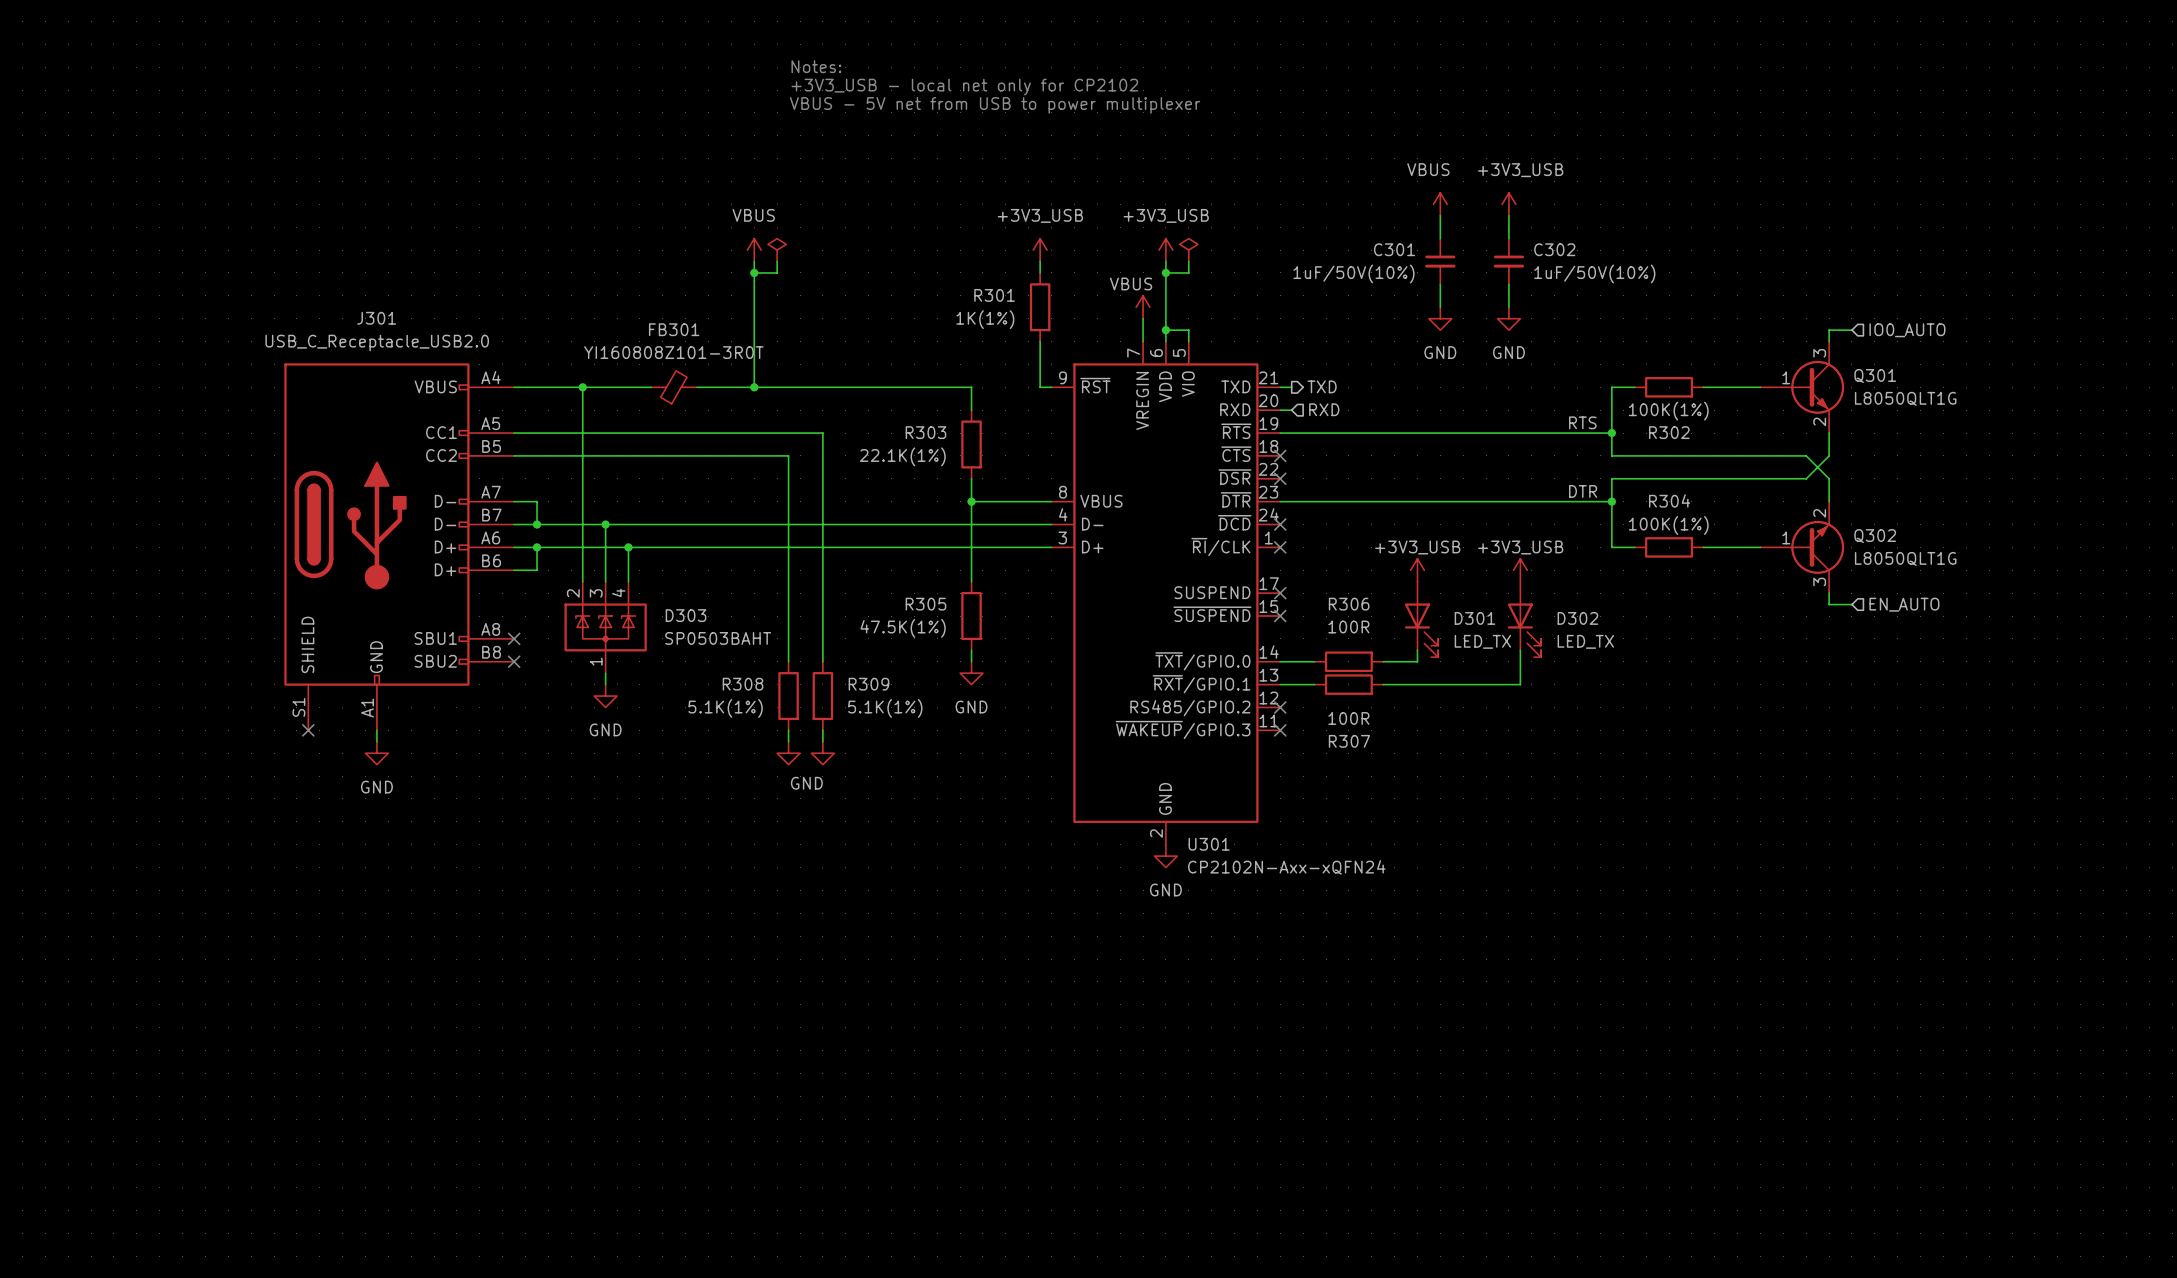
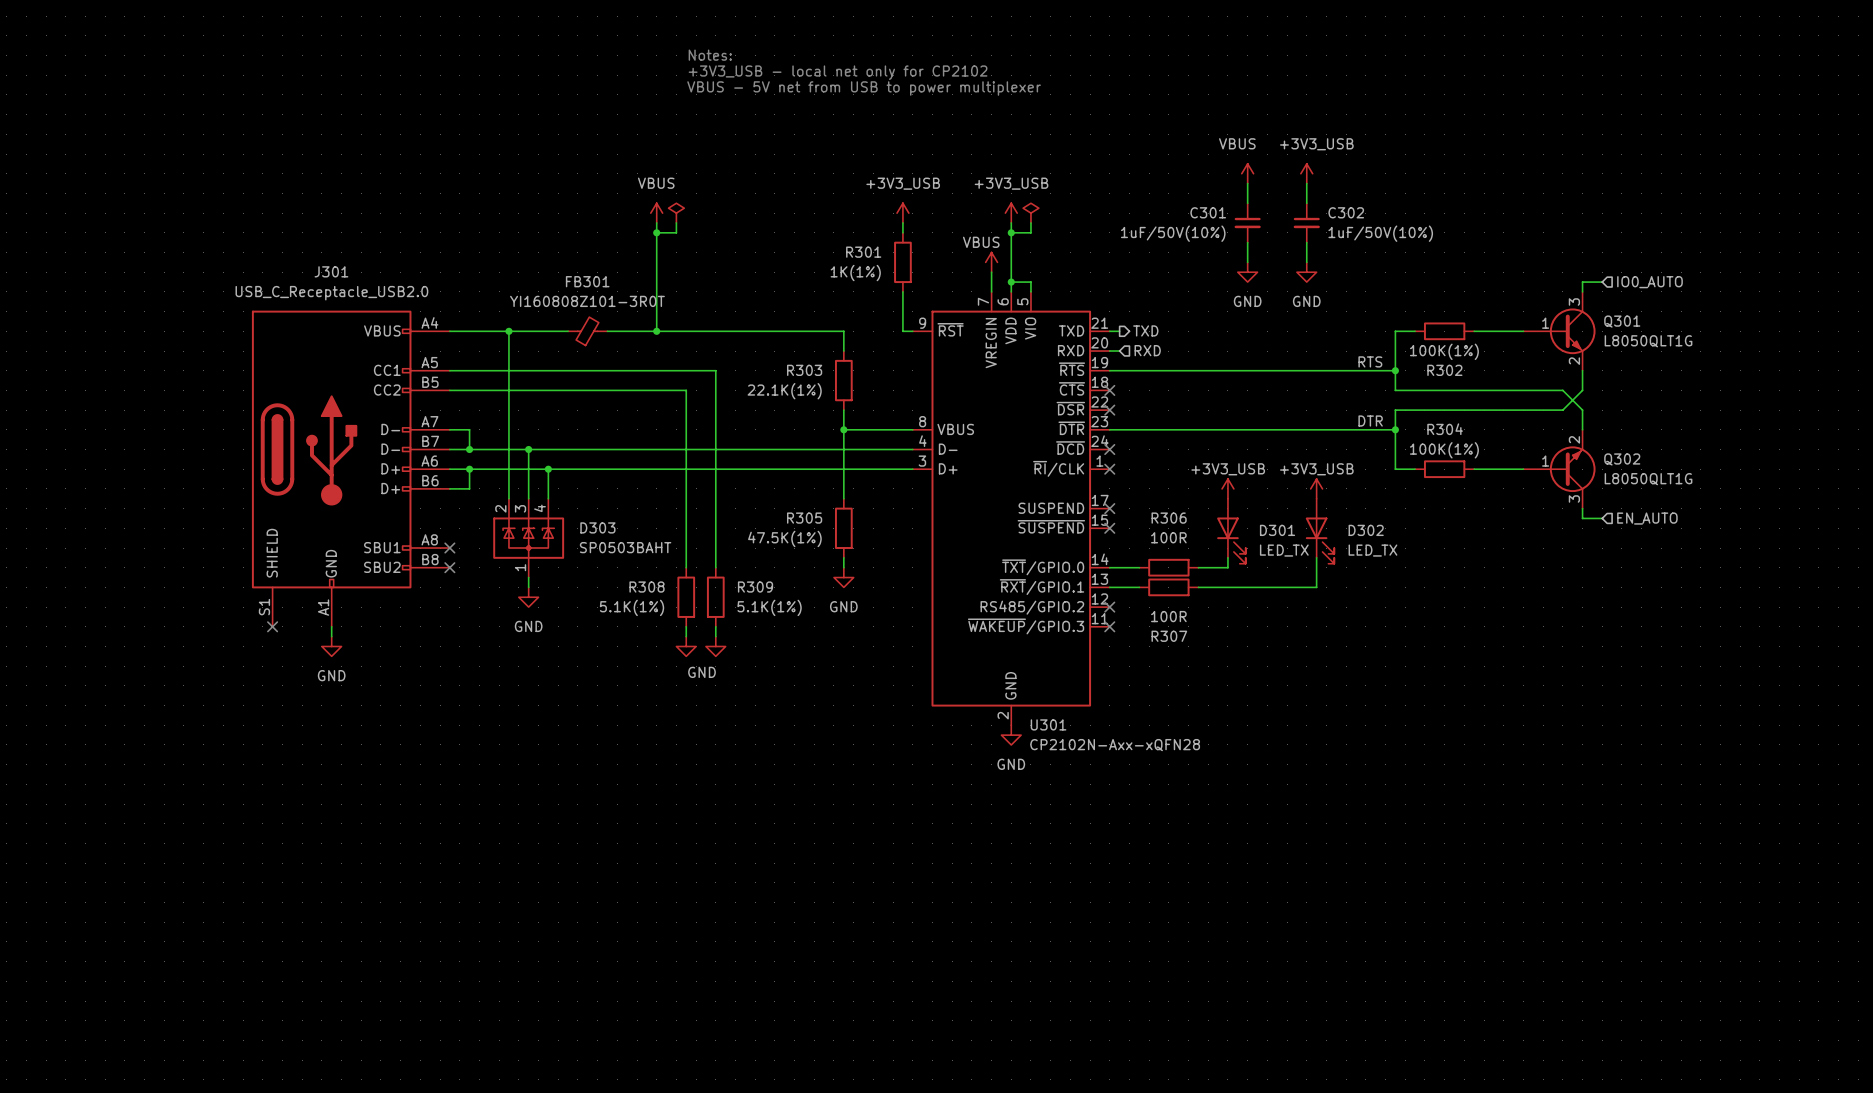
U301 value: CP2102N-Axx-xQFN24 (1286, 867) -> CP2102N-Axx-xQFN28 (1115, 745)

